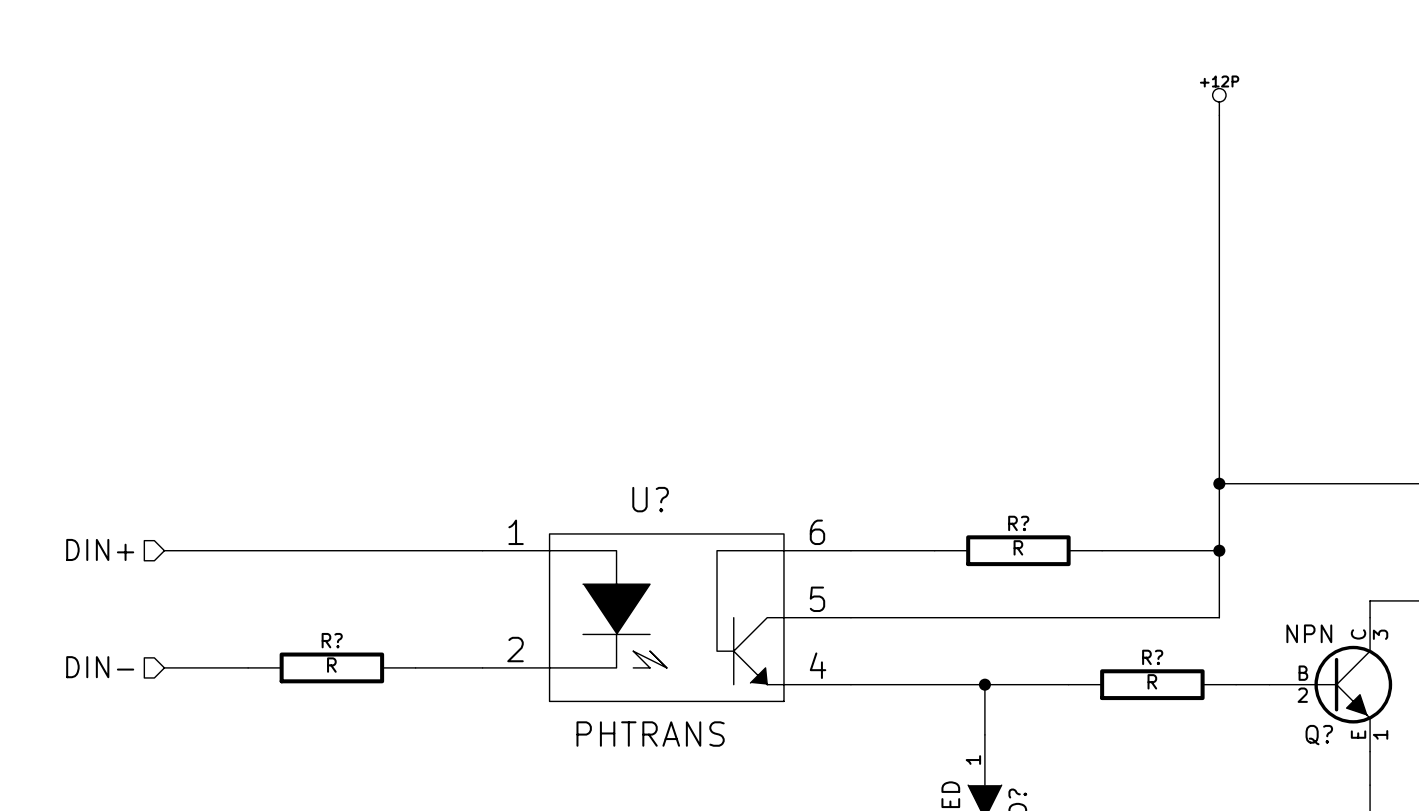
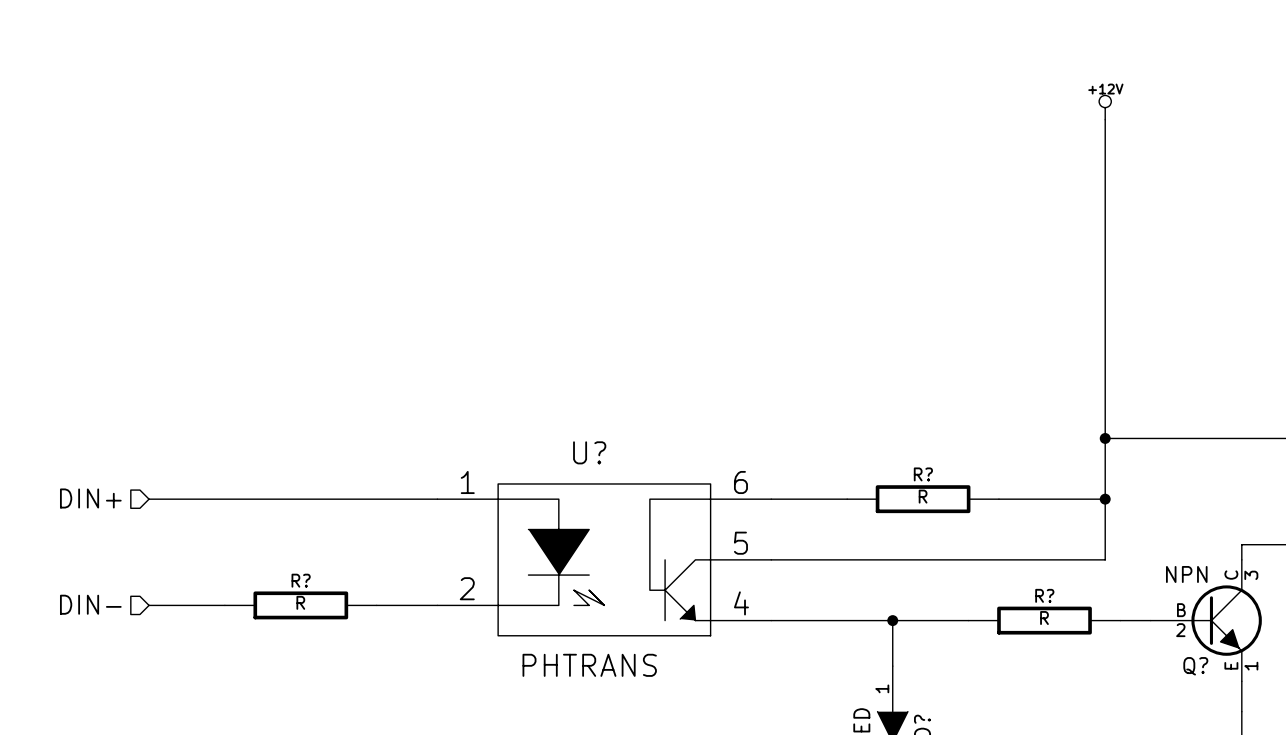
power symbol: +12P (1219, 101) -> none
power symbol: none -> +12V (1105, 107)

